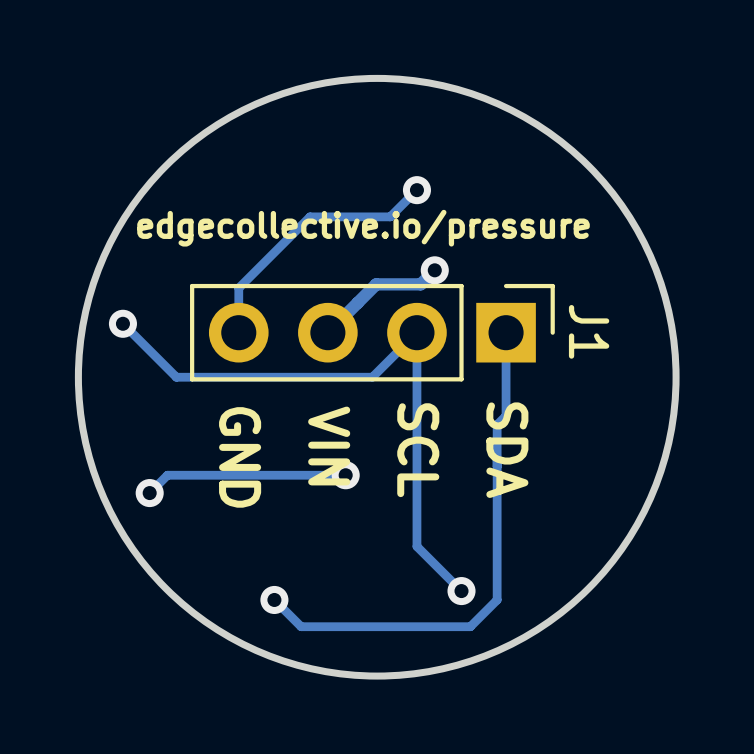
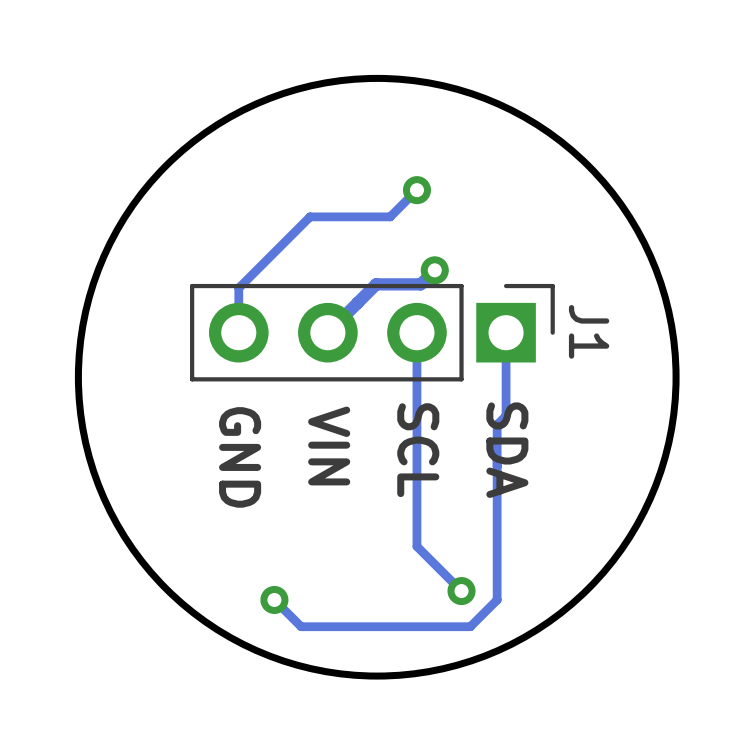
text: edgecollective.io/pressure (363, 228) -> none
track: (122, 323) (176, 377) (372, 377) (416, 332) -> none
via: (122, 323) -> none
track: (345, 475) (167, 475) (149, 493) -> none
via: (345, 475) -> none
via: (149, 493) -> none

